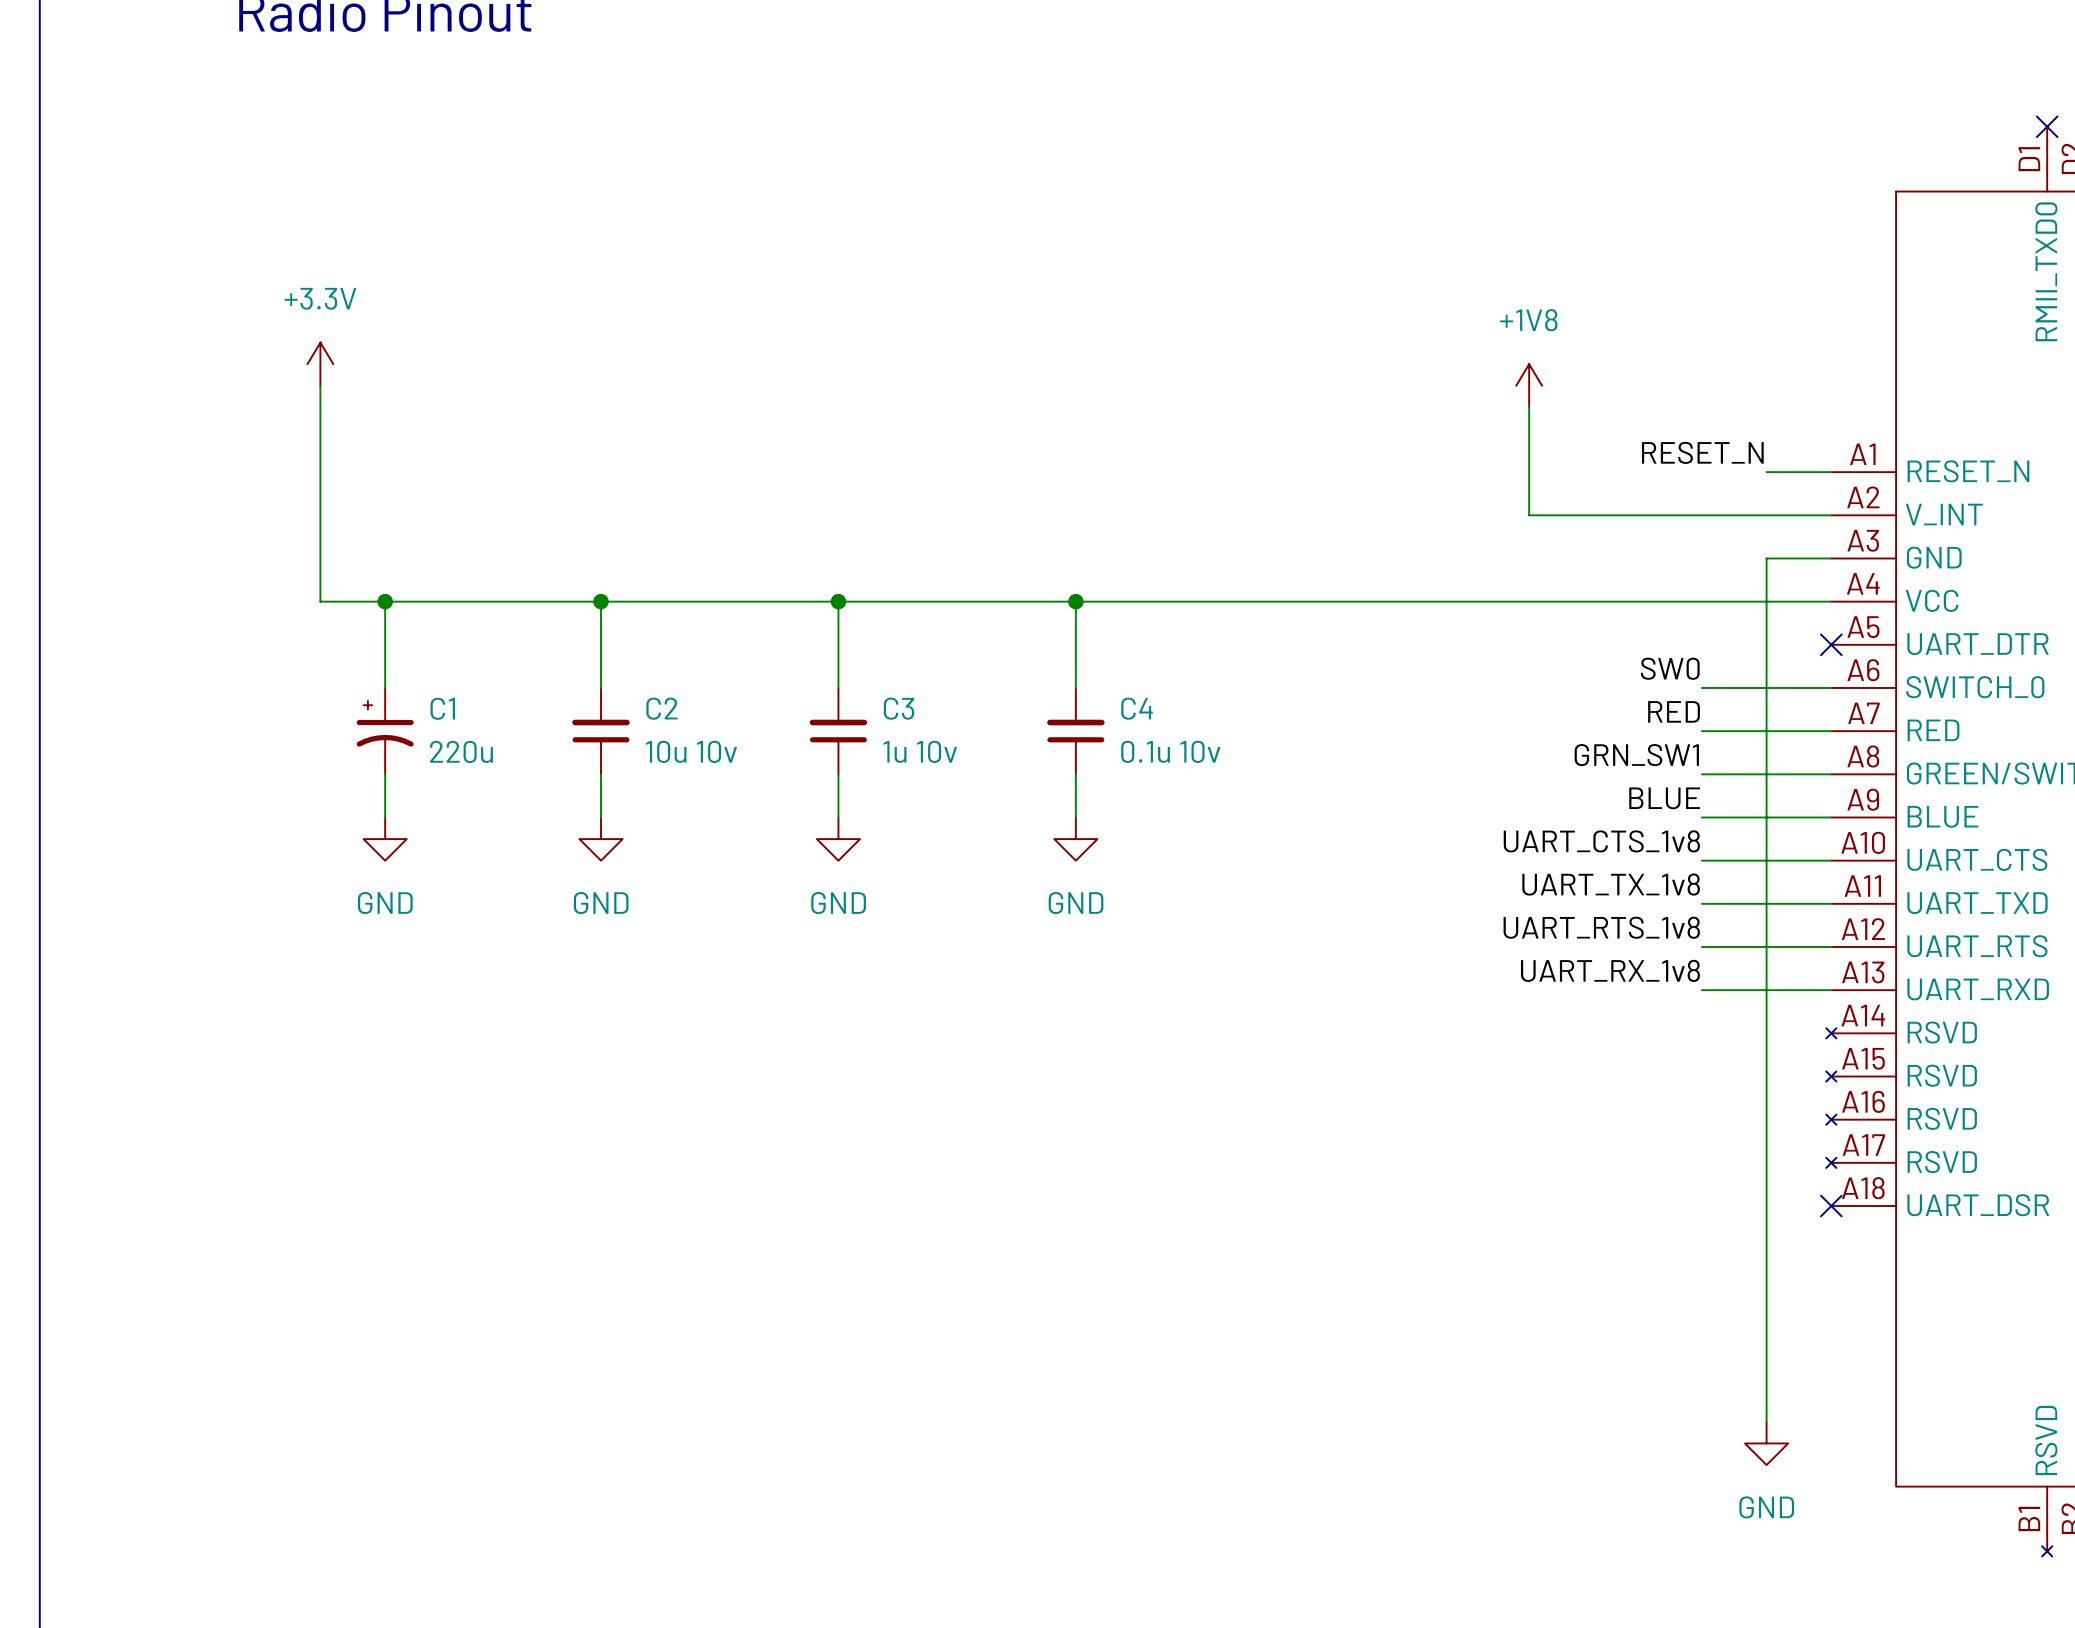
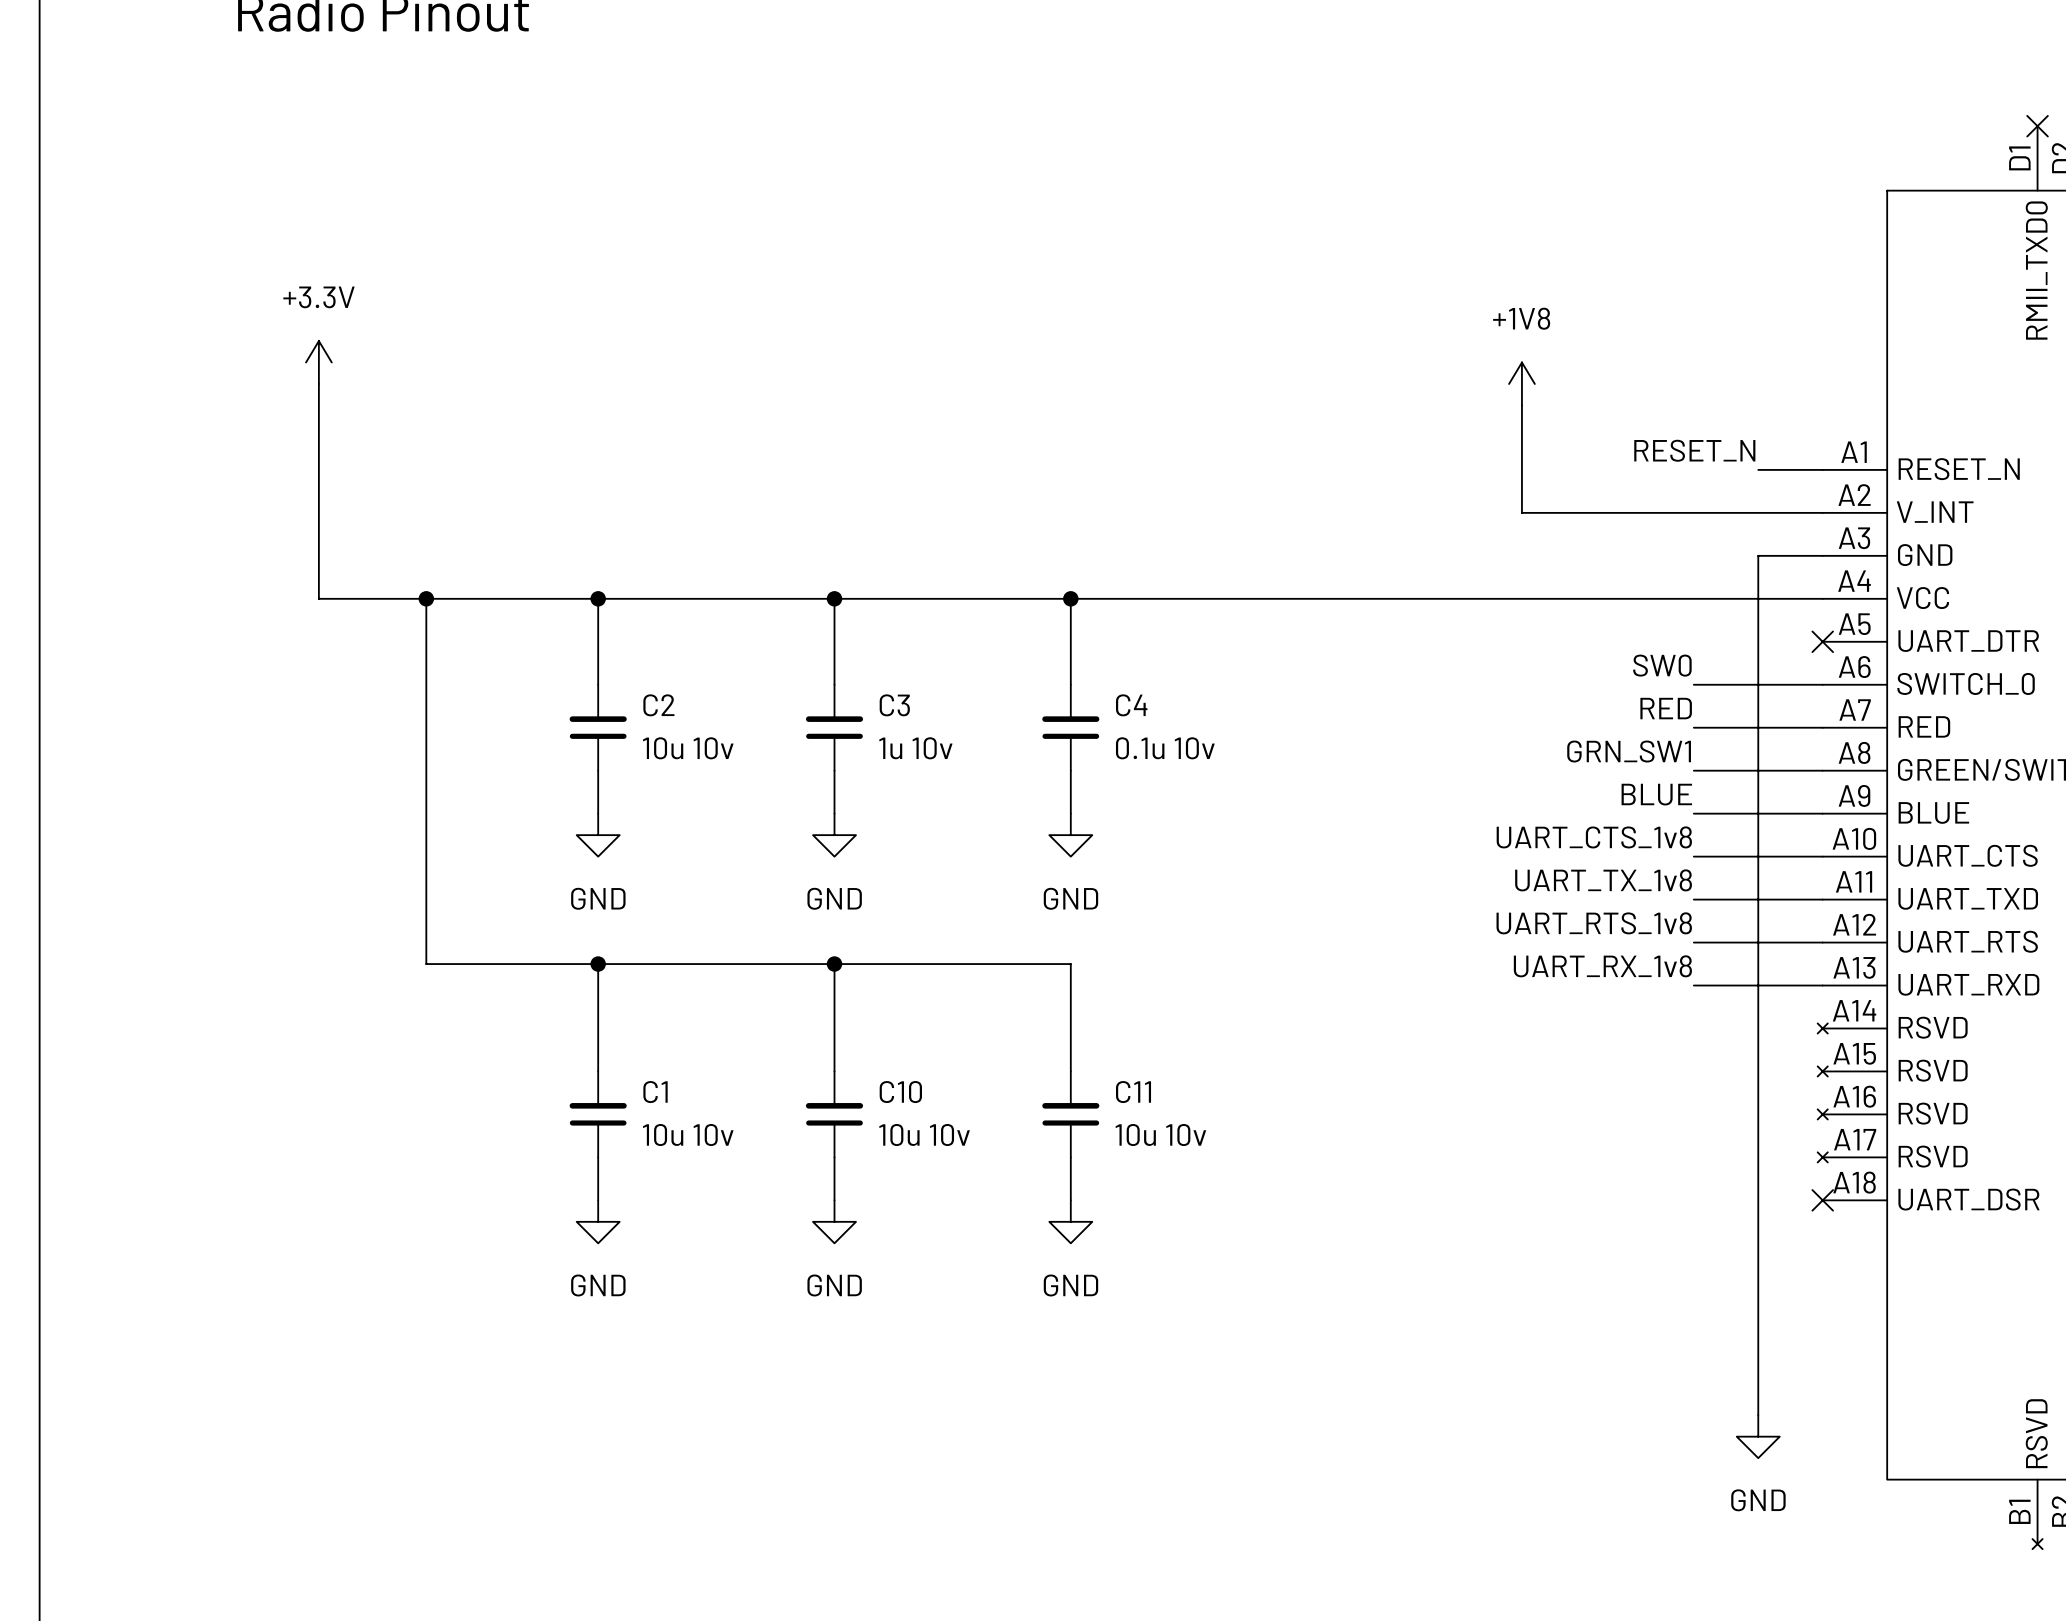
wire: (385, 601) (385, 687) -> none
junction position: (385, 601) -> (426, 598)
wire: none -> (426, 598) (426, 964) (1070, 964) (1070, 1071)
C1 symbol: [356, 687, 414, 775] -> [569, 1071, 627, 1158]
C1 value: 220u (461, 751) -> 10u 10v (688, 1135)
wire: (385, 774) (385, 817) -> none
power symbol: GND (385, 839) -> none
wire: none -> (598, 964) (598, 1071)
junction: none -> (598, 964)
wire: none -> (834, 964) (834, 1071)
junction: none -> (834, 964)
C10: none -> 10u 10v (834, 1114)
C11: none -> 10u 10v (1070, 1114)
wire: none -> (598, 1157) (598, 1200)
wire: none -> (834, 1157) (834, 1200)
wire: none -> (1070, 1157) (1070, 1200)
power symbol: none -> GND (598, 1221)
power symbol: none -> GND (834, 1221)
power symbol: none -> GND (1070, 1221)

